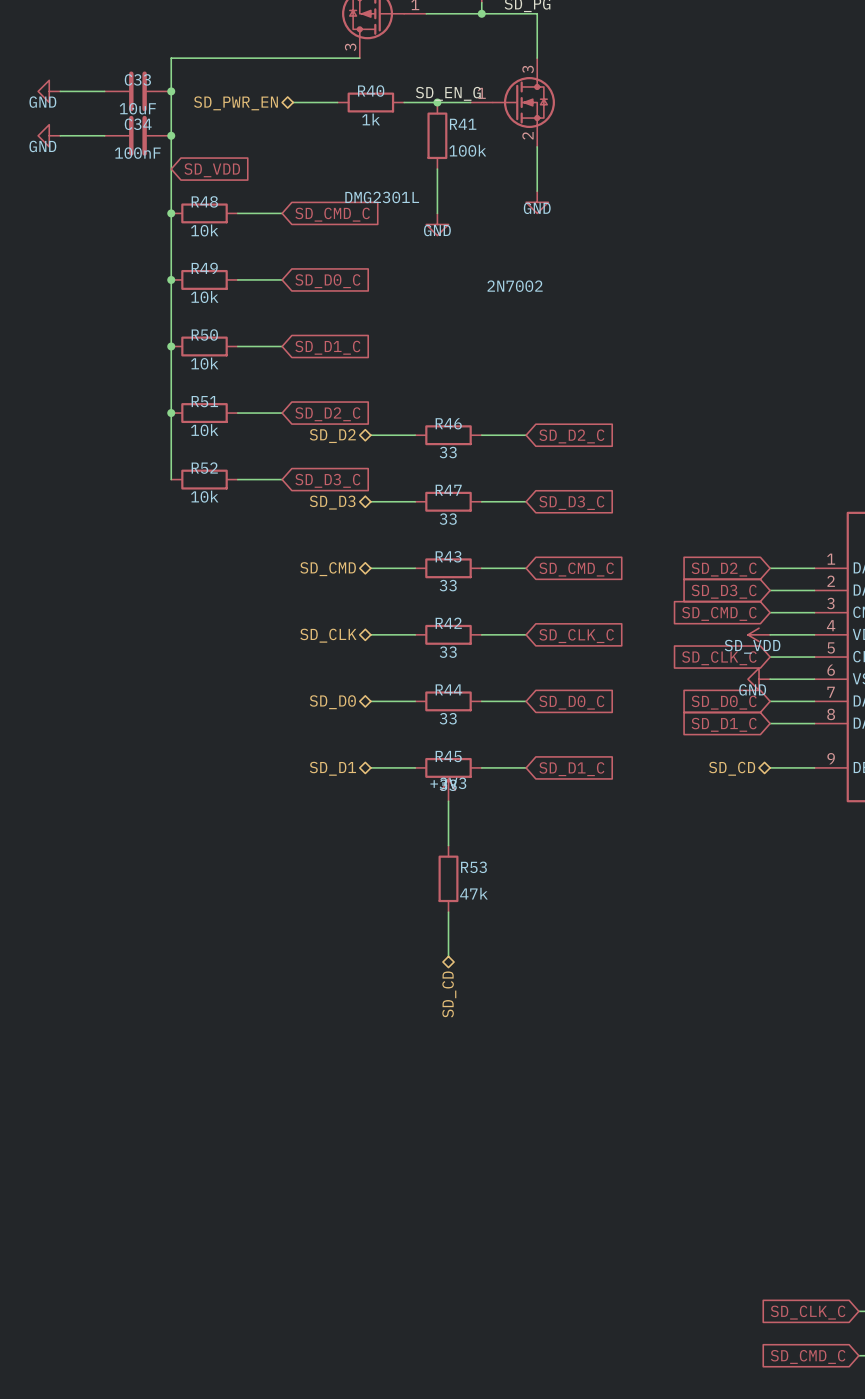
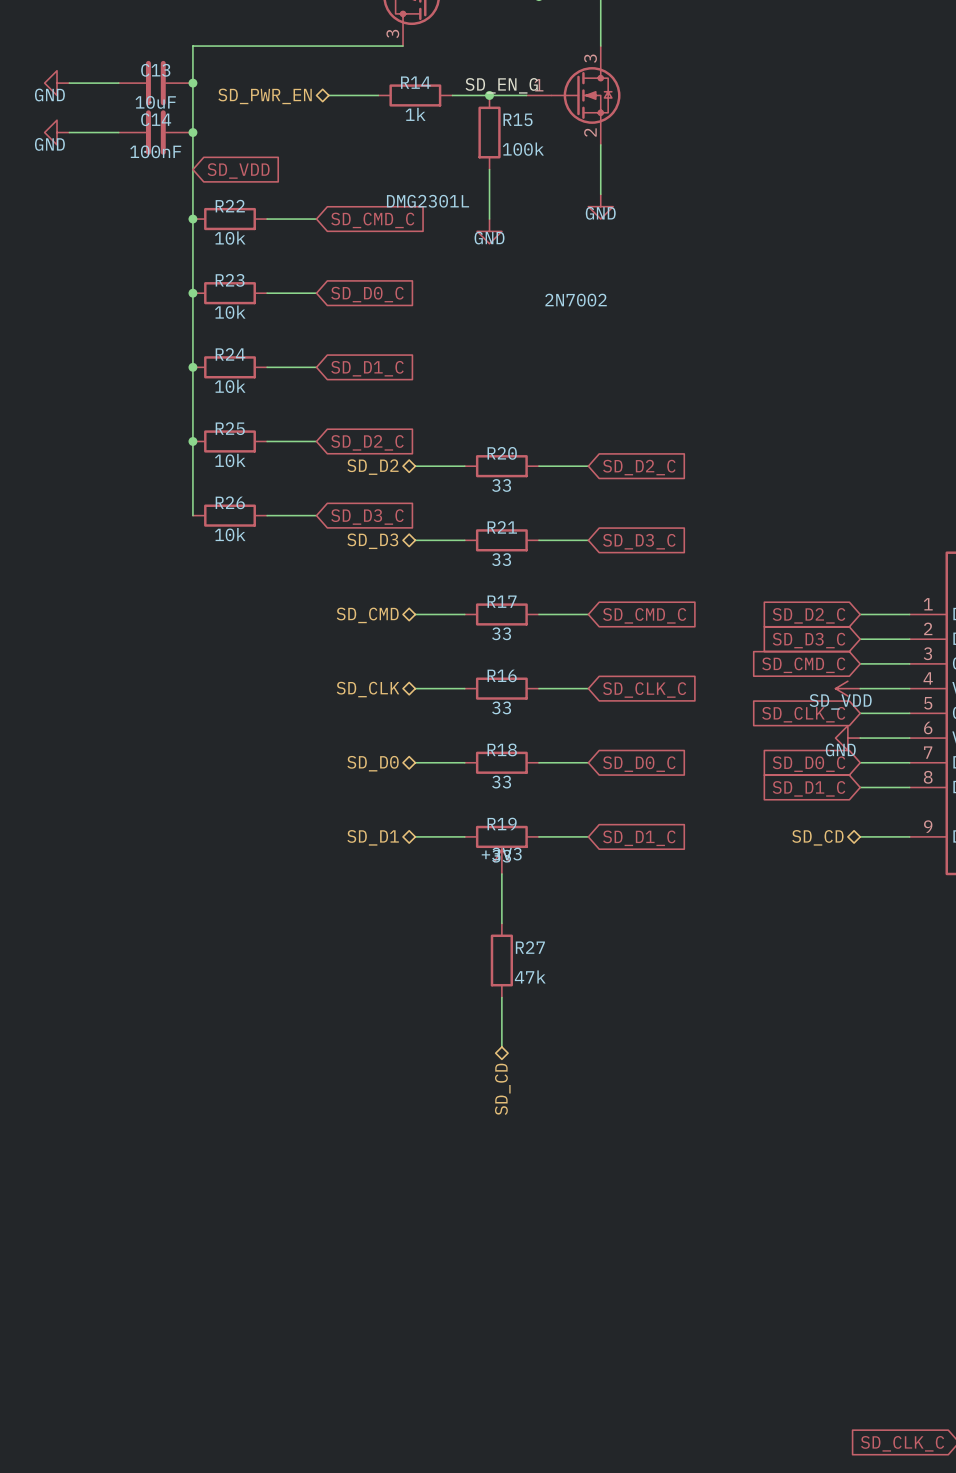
C33 name: C33 (137, 79) -> C13 (155, 70)
R40 name: R40 (371, 91) -> R14 (415, 82)
C34 name: C34 (138, 124) -> C14 (156, 119)
R41 name: R41 (463, 124) -> R15 (518, 119)
R48 name: R48 (204, 201) -> R22 (230, 206)
R49 name: R49 (204, 268) -> R23 (230, 280)
R50 name: R50 (204, 334) -> R24 (230, 354)
R51 name: R51 (204, 401) -> R25 (230, 428)
R46 name: R46 (448, 423) -> R20 (502, 453)
R52 name: R52 (204, 468) -> R26 (230, 502)
R47 name: R47 (448, 490) -> R21 (502, 527)
R43 name: R43 (448, 556) -> R17 (502, 601)
R42 name: R42 (448, 623) -> R16 (502, 675)
R44 name: R44 (448, 689) -> R18 (502, 749)
R45 name: R45 (448, 756) -> R19 (502, 823)
R53 name: R53 (473, 867) -> R27 (530, 947)

